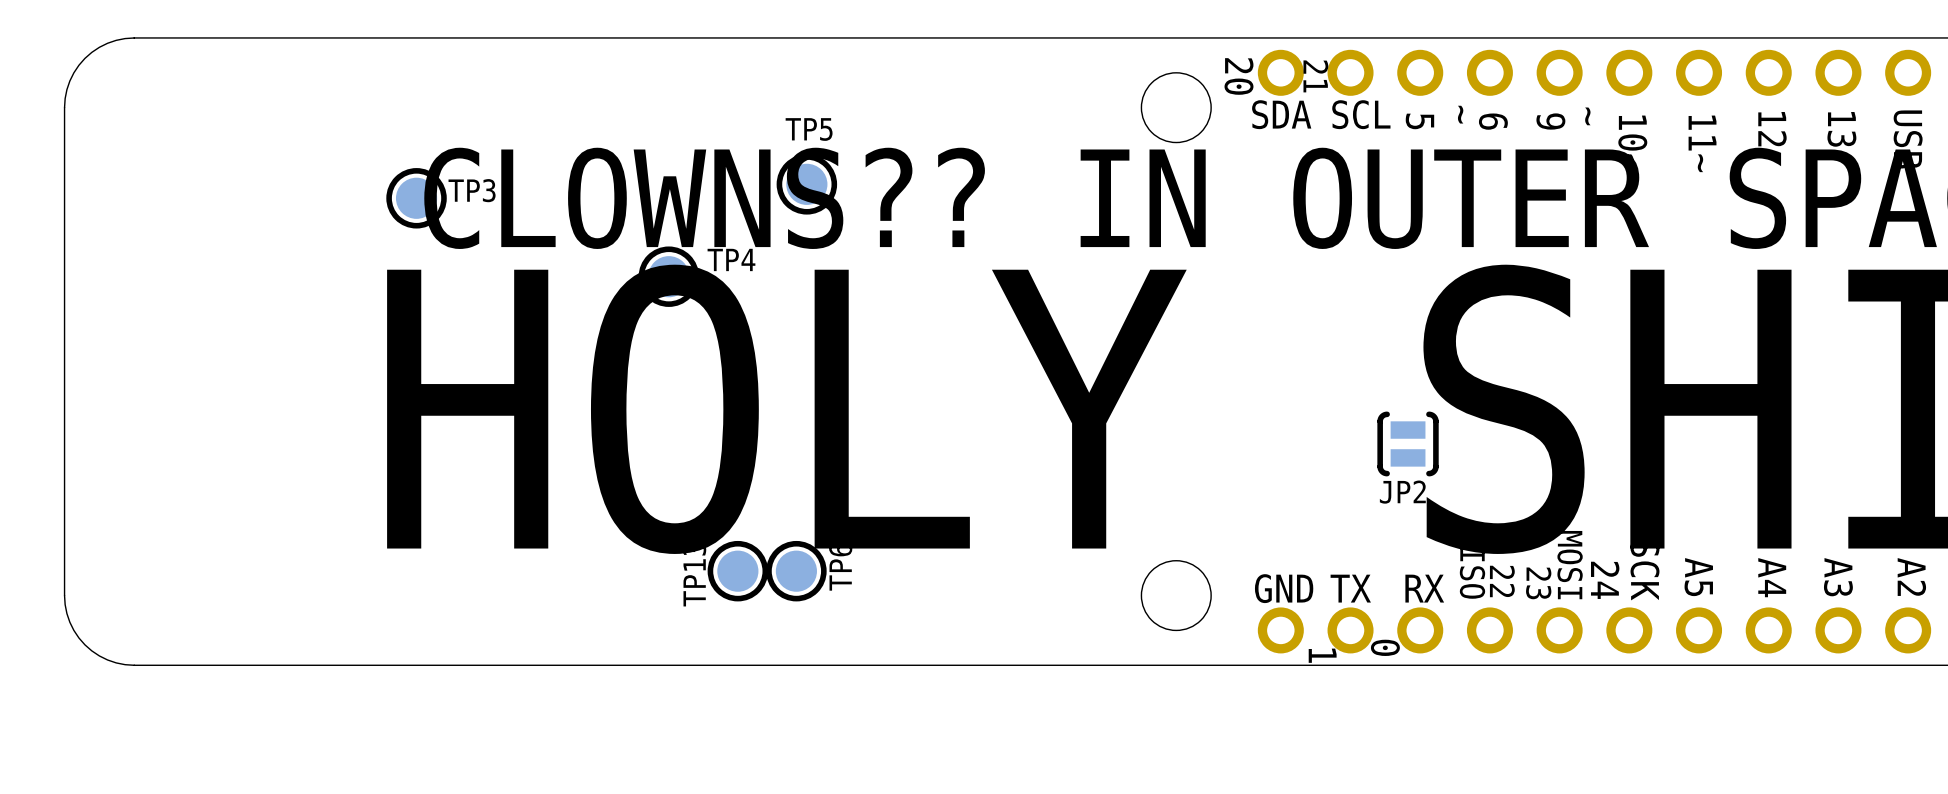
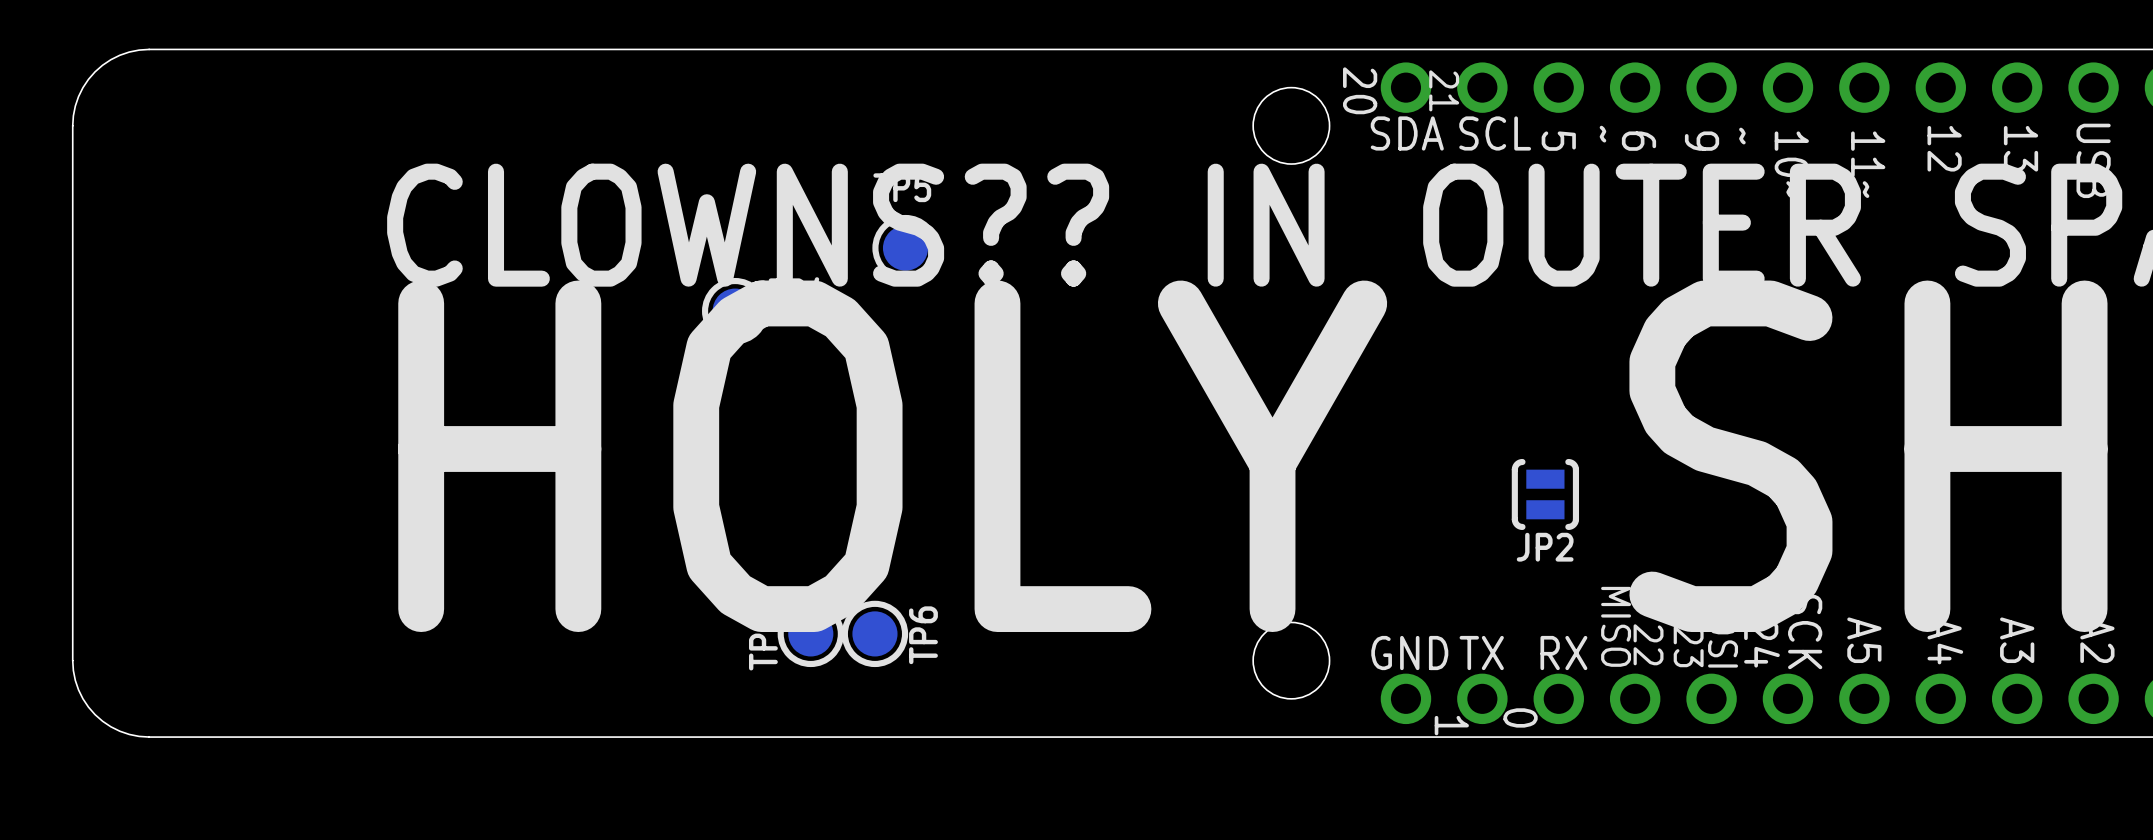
TP5 position: (806, 184) -> (905, 248)
TP3: (416, 198) -> none

